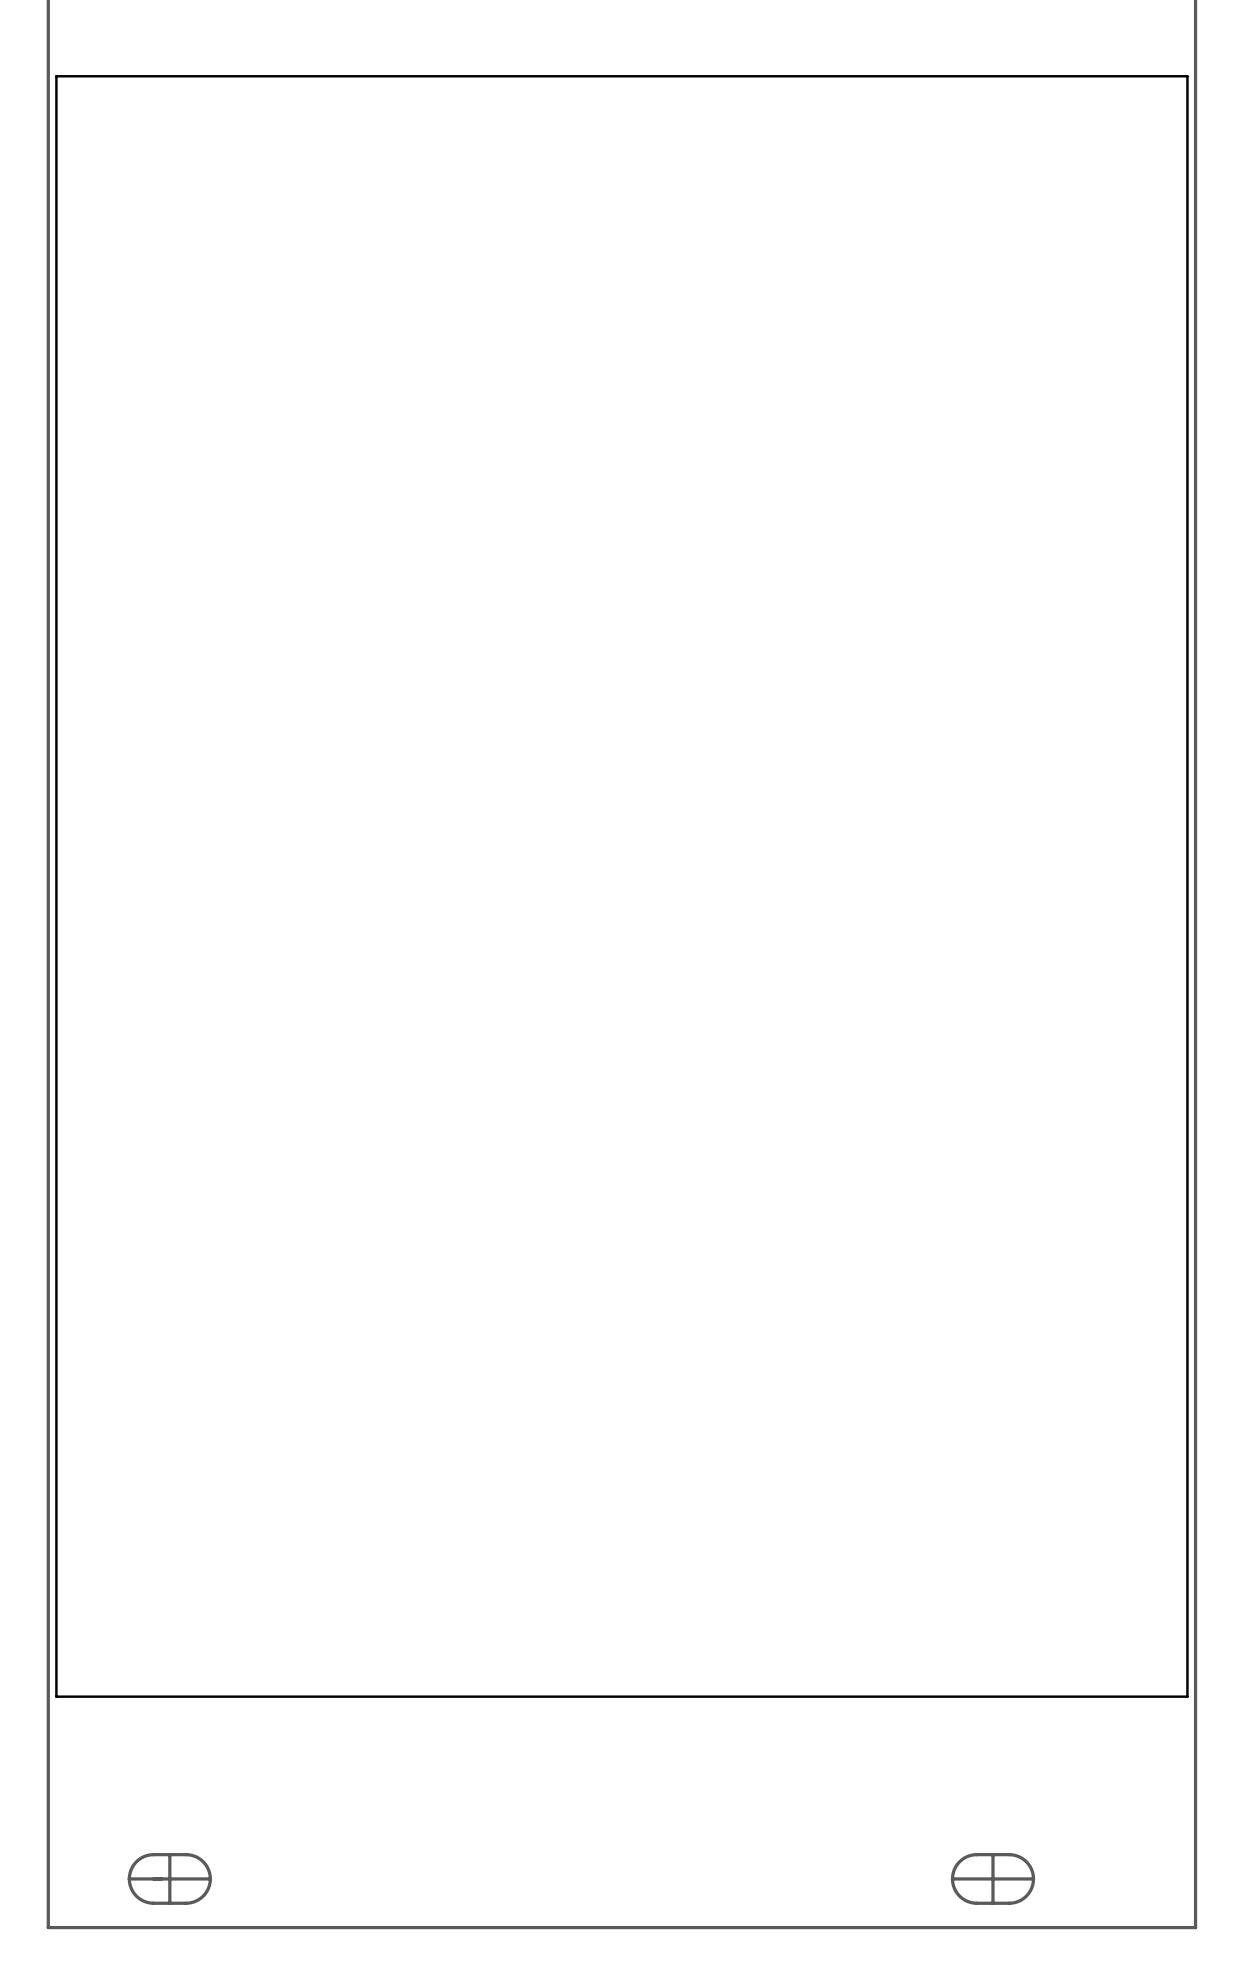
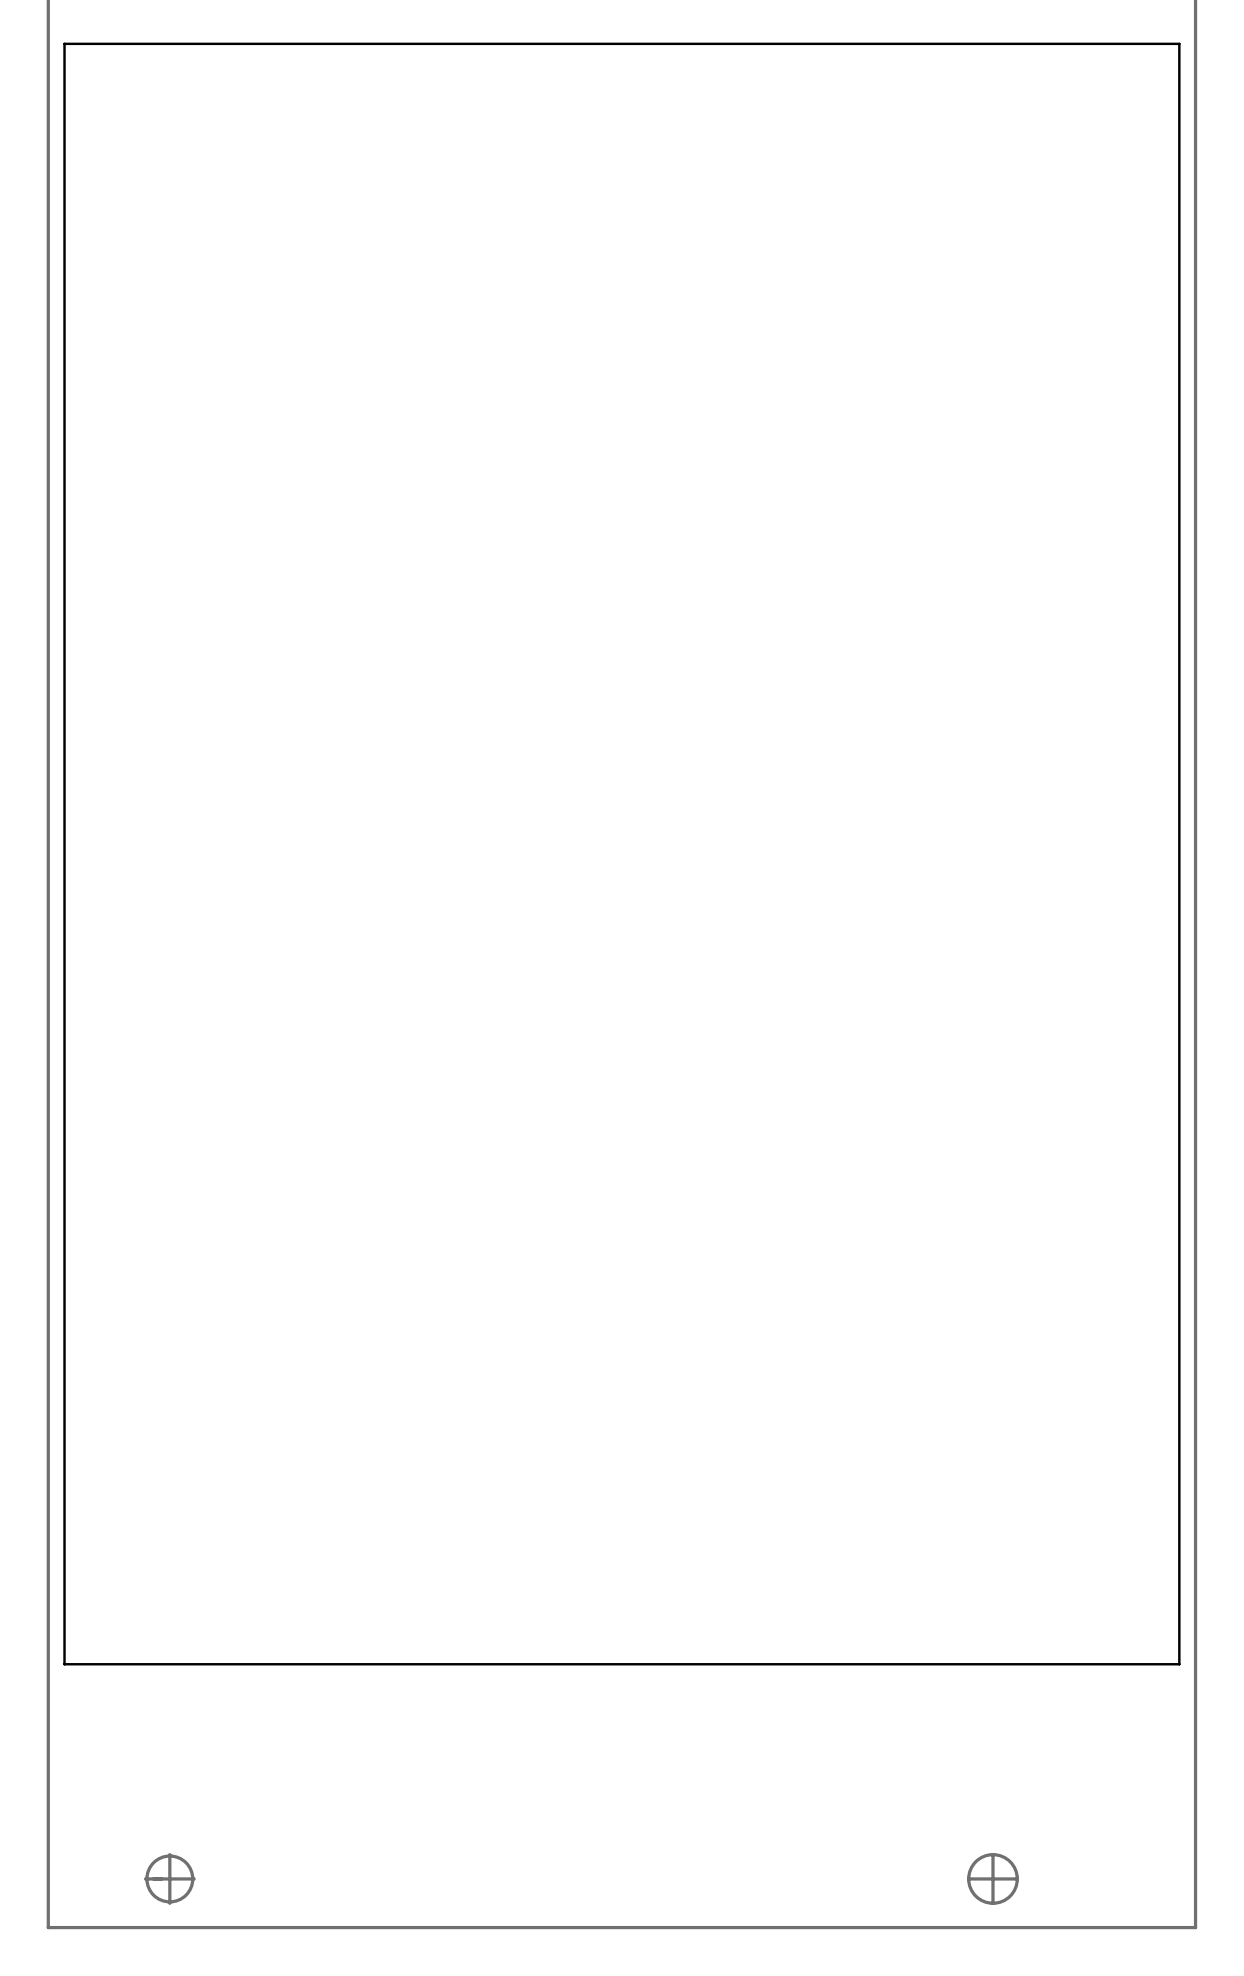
board edge: (56, 76) (1187, 76) (1187, 1696) (56, 1696) (56, 76) -> (64, 43) (64, 1664) (1179, 1664) (1179, 43) (64, 43)
drawing: none -> [967, 1853, 1019, 1905]
drawing: none -> [145, 1854, 195, 1904]
line: (129, 1878) (145, 1878) -> none
line: (129, 1878) (131, 1888) (136, 1896) (144, 1901) (153, 1903) (195, 1901) (205, 1893) (210, 1878) -> none
line: (129, 1878) (131, 1869) (136, 1861) (144, 1856) (153, 1854) (195, 1856) (205, 1864) (210, 1878) -> none
line: (194, 1878) (210, 1878) -> none
line: (952, 1878) (968, 1878) -> none
line: (952, 1878) (954, 1888) (959, 1896) (967, 1901) (976, 1903) (1018, 1901) (1028, 1893) (1033, 1878) -> none
line: (952, 1878) (954, 1869) (959, 1861) (967, 1856) (976, 1854) (1018, 1856) (1028, 1864) (1033, 1878) -> none
line: (1017, 1878) (1033, 1878) -> none

